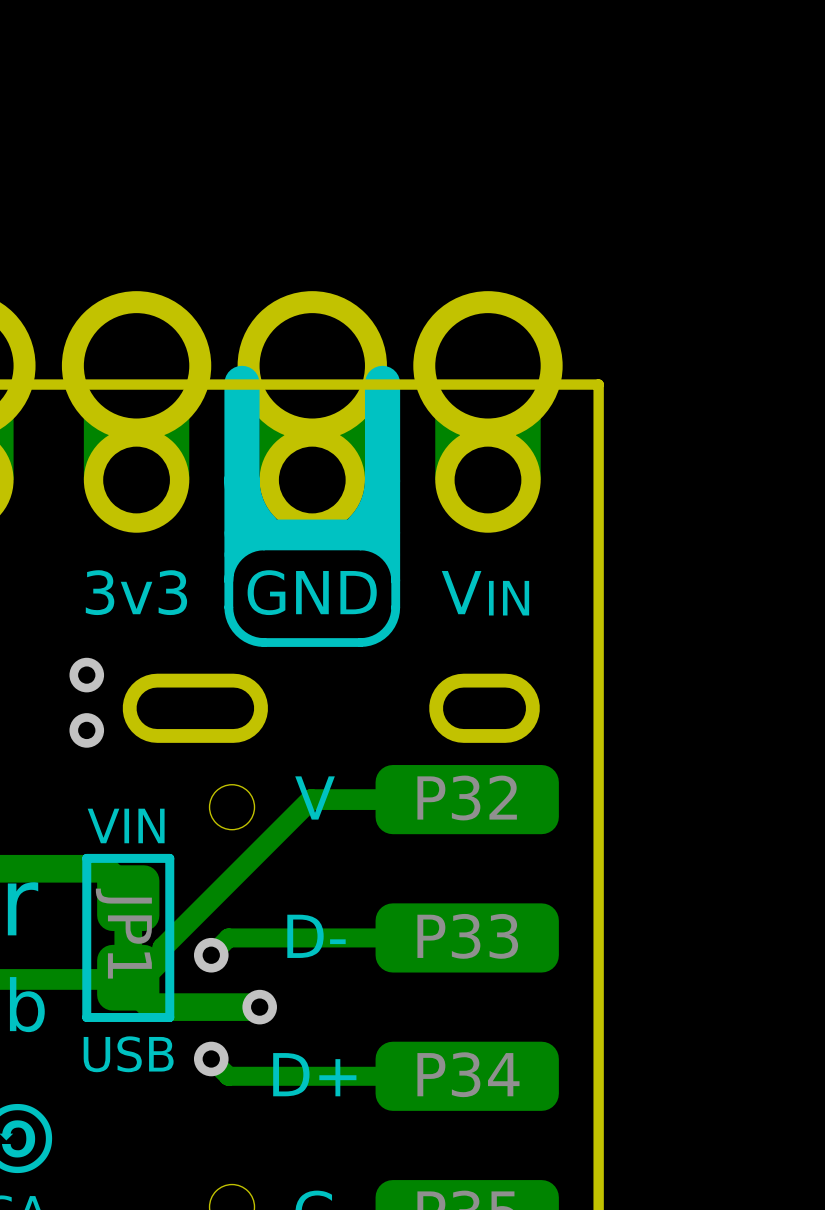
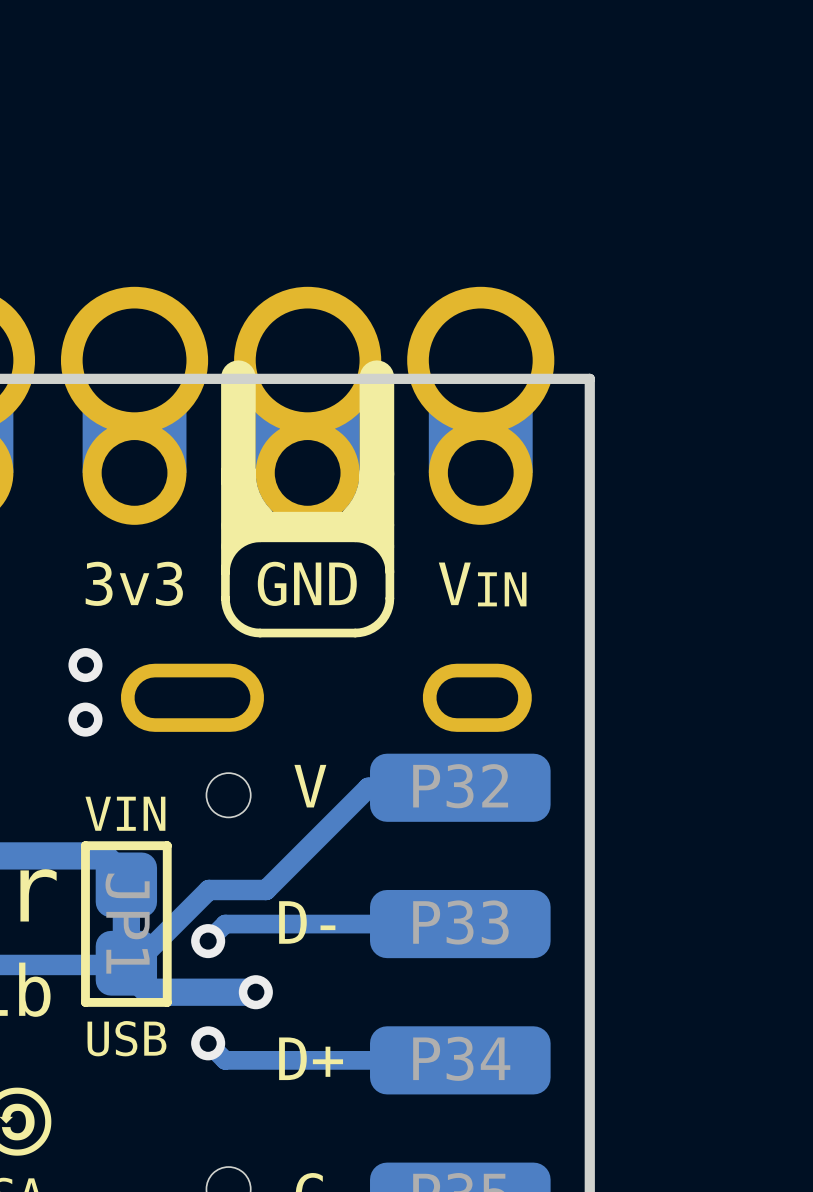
track: (373, 799) (311, 799) (162, 947) (162, 959) (142, 979) -> (368, 787) (266, 889) (208, 889) (135, 963) (126, 963)

